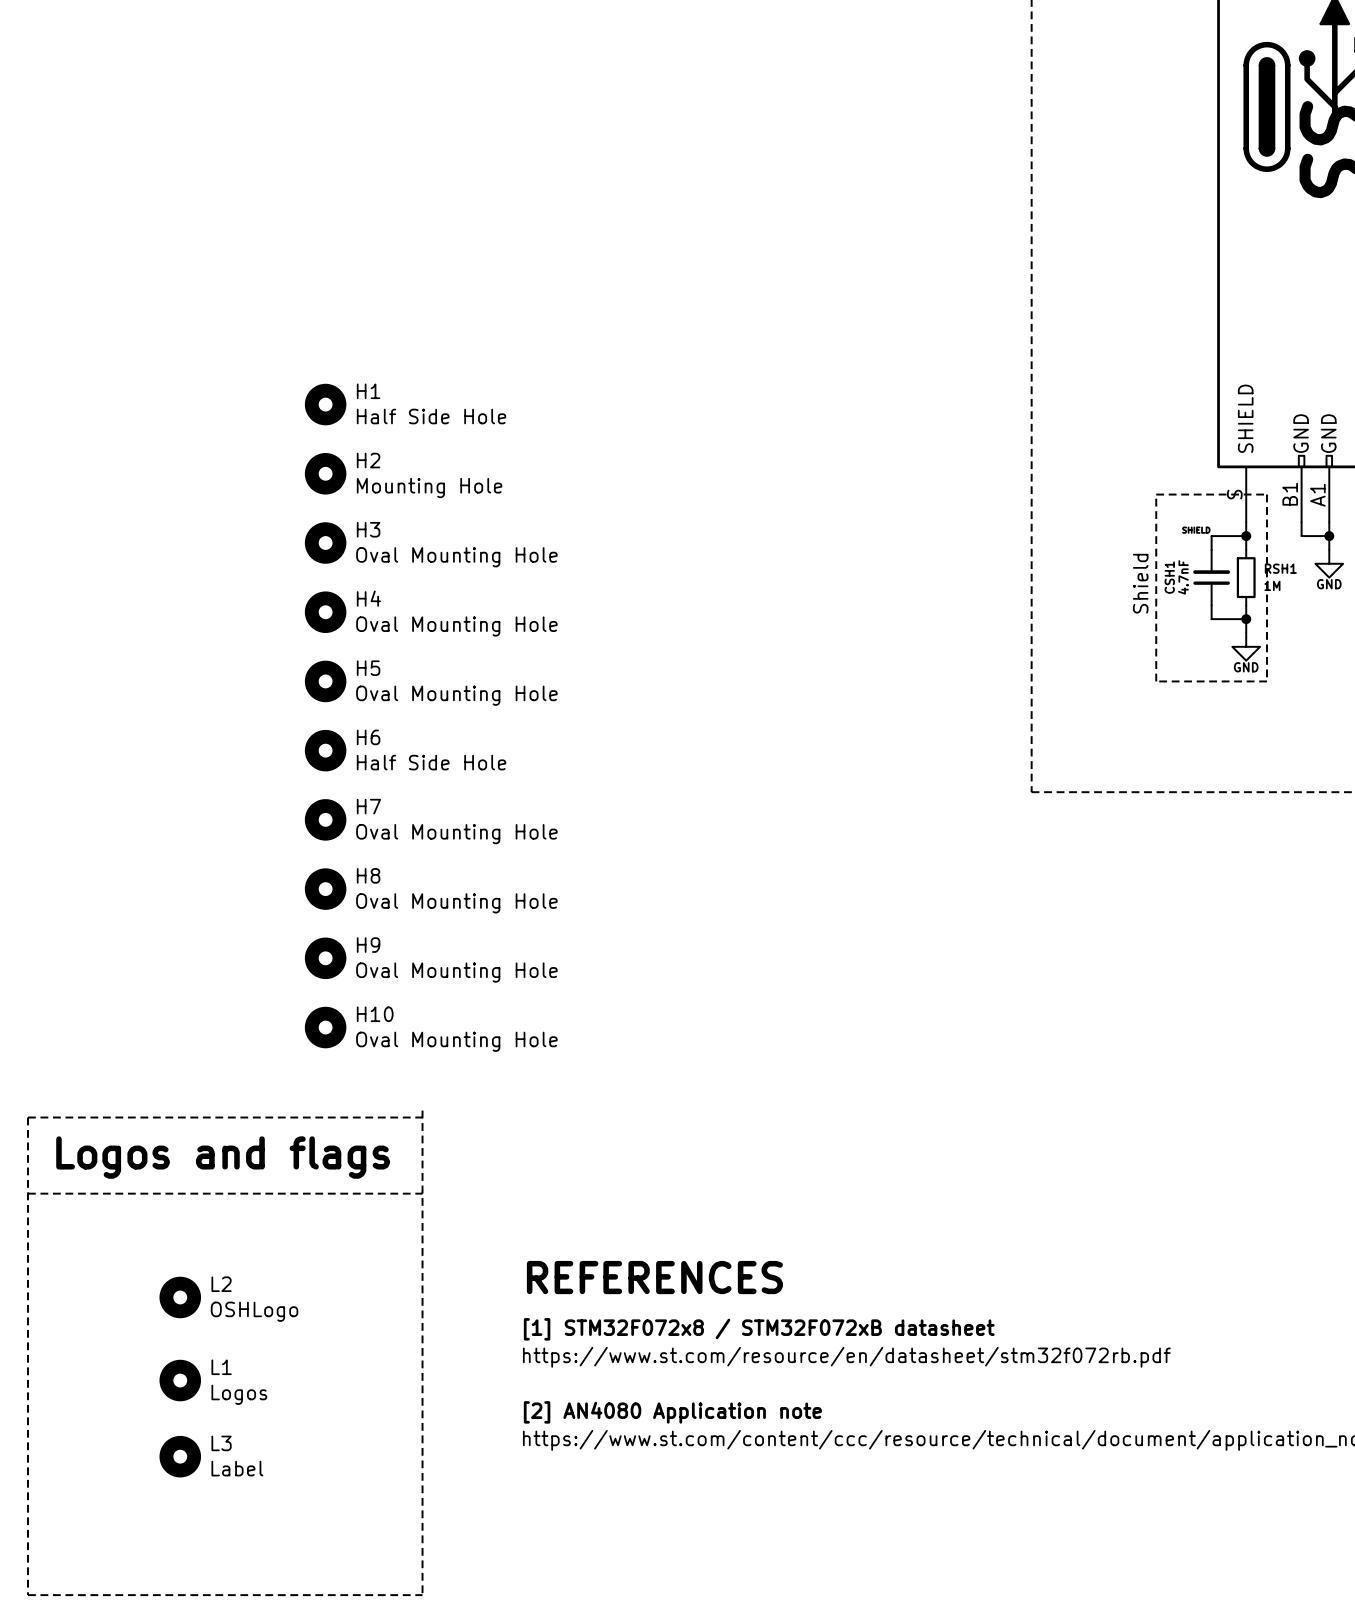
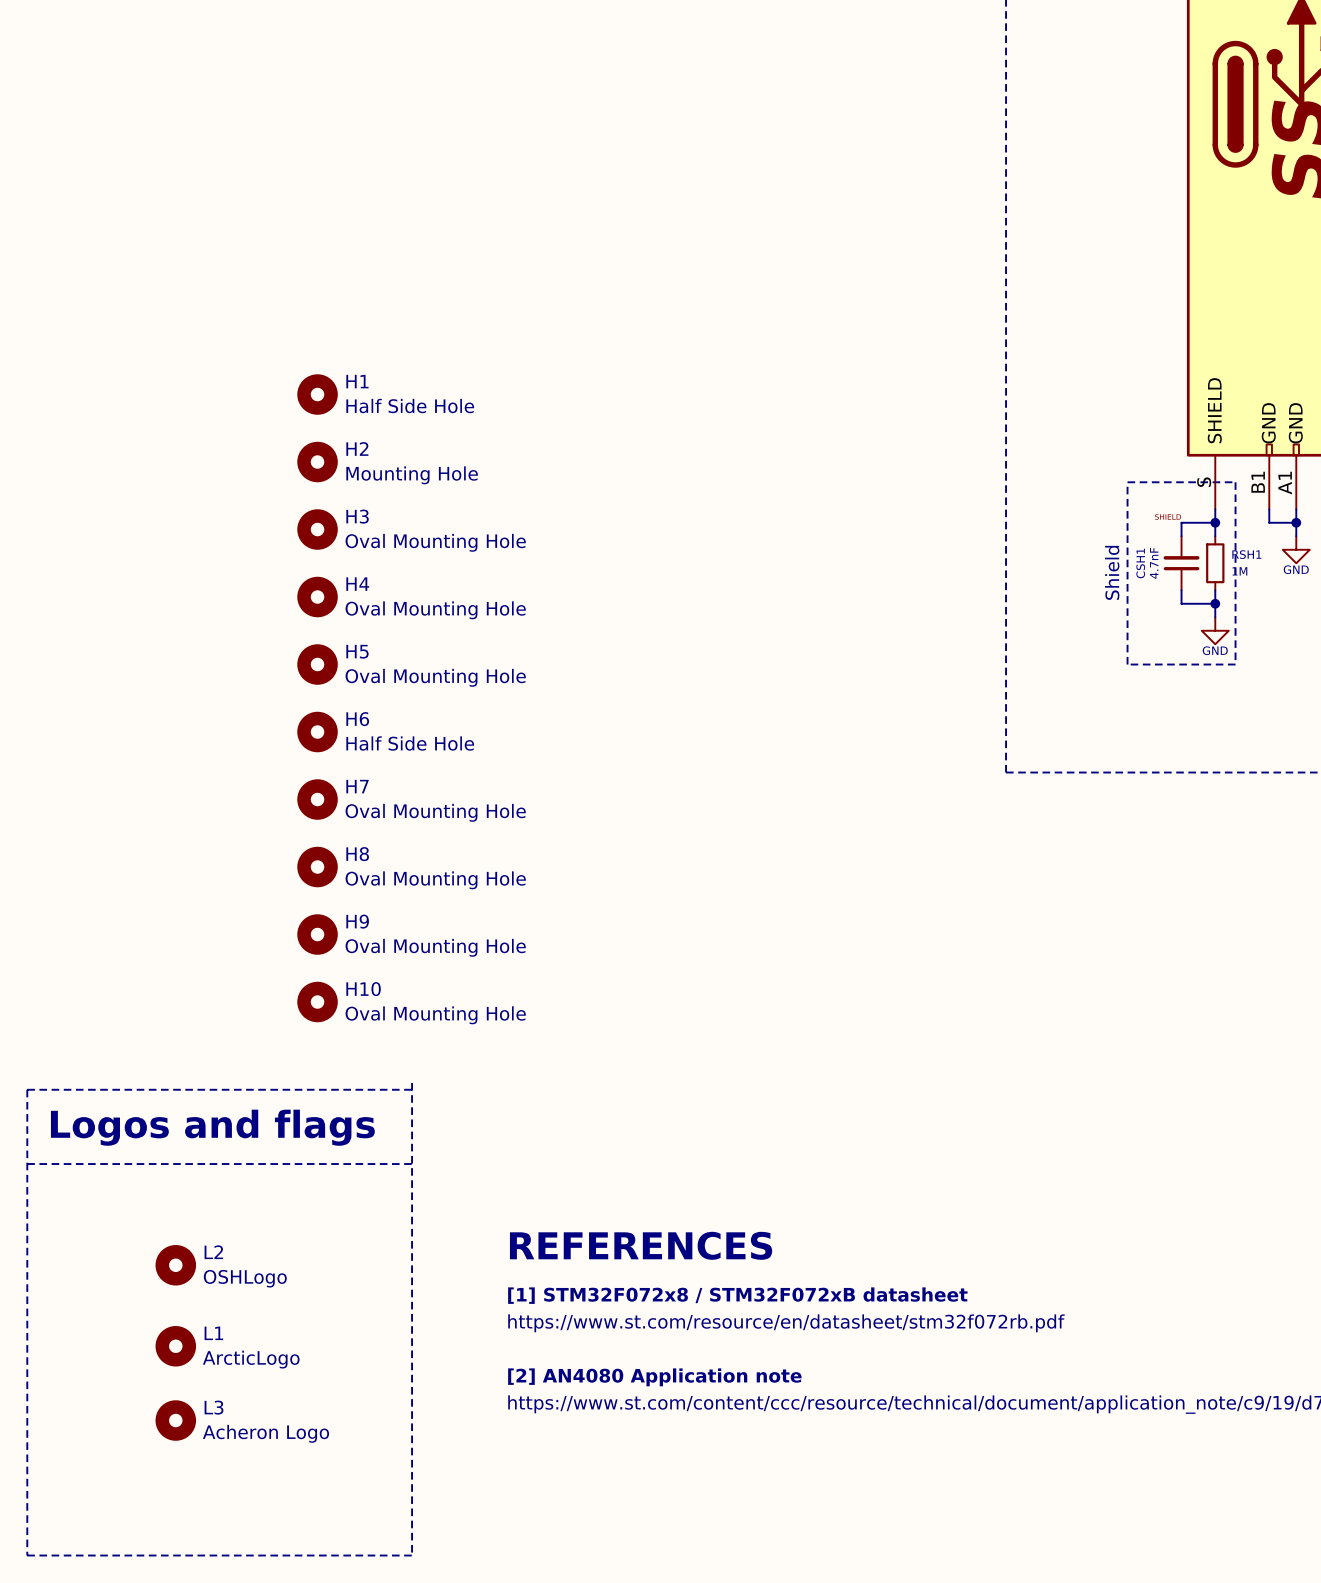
L1 value: Logos (239, 1394) -> ArcticLogo (251, 1359)
L3 value: Label (237, 1468) -> Acheron Logo (265, 1433)

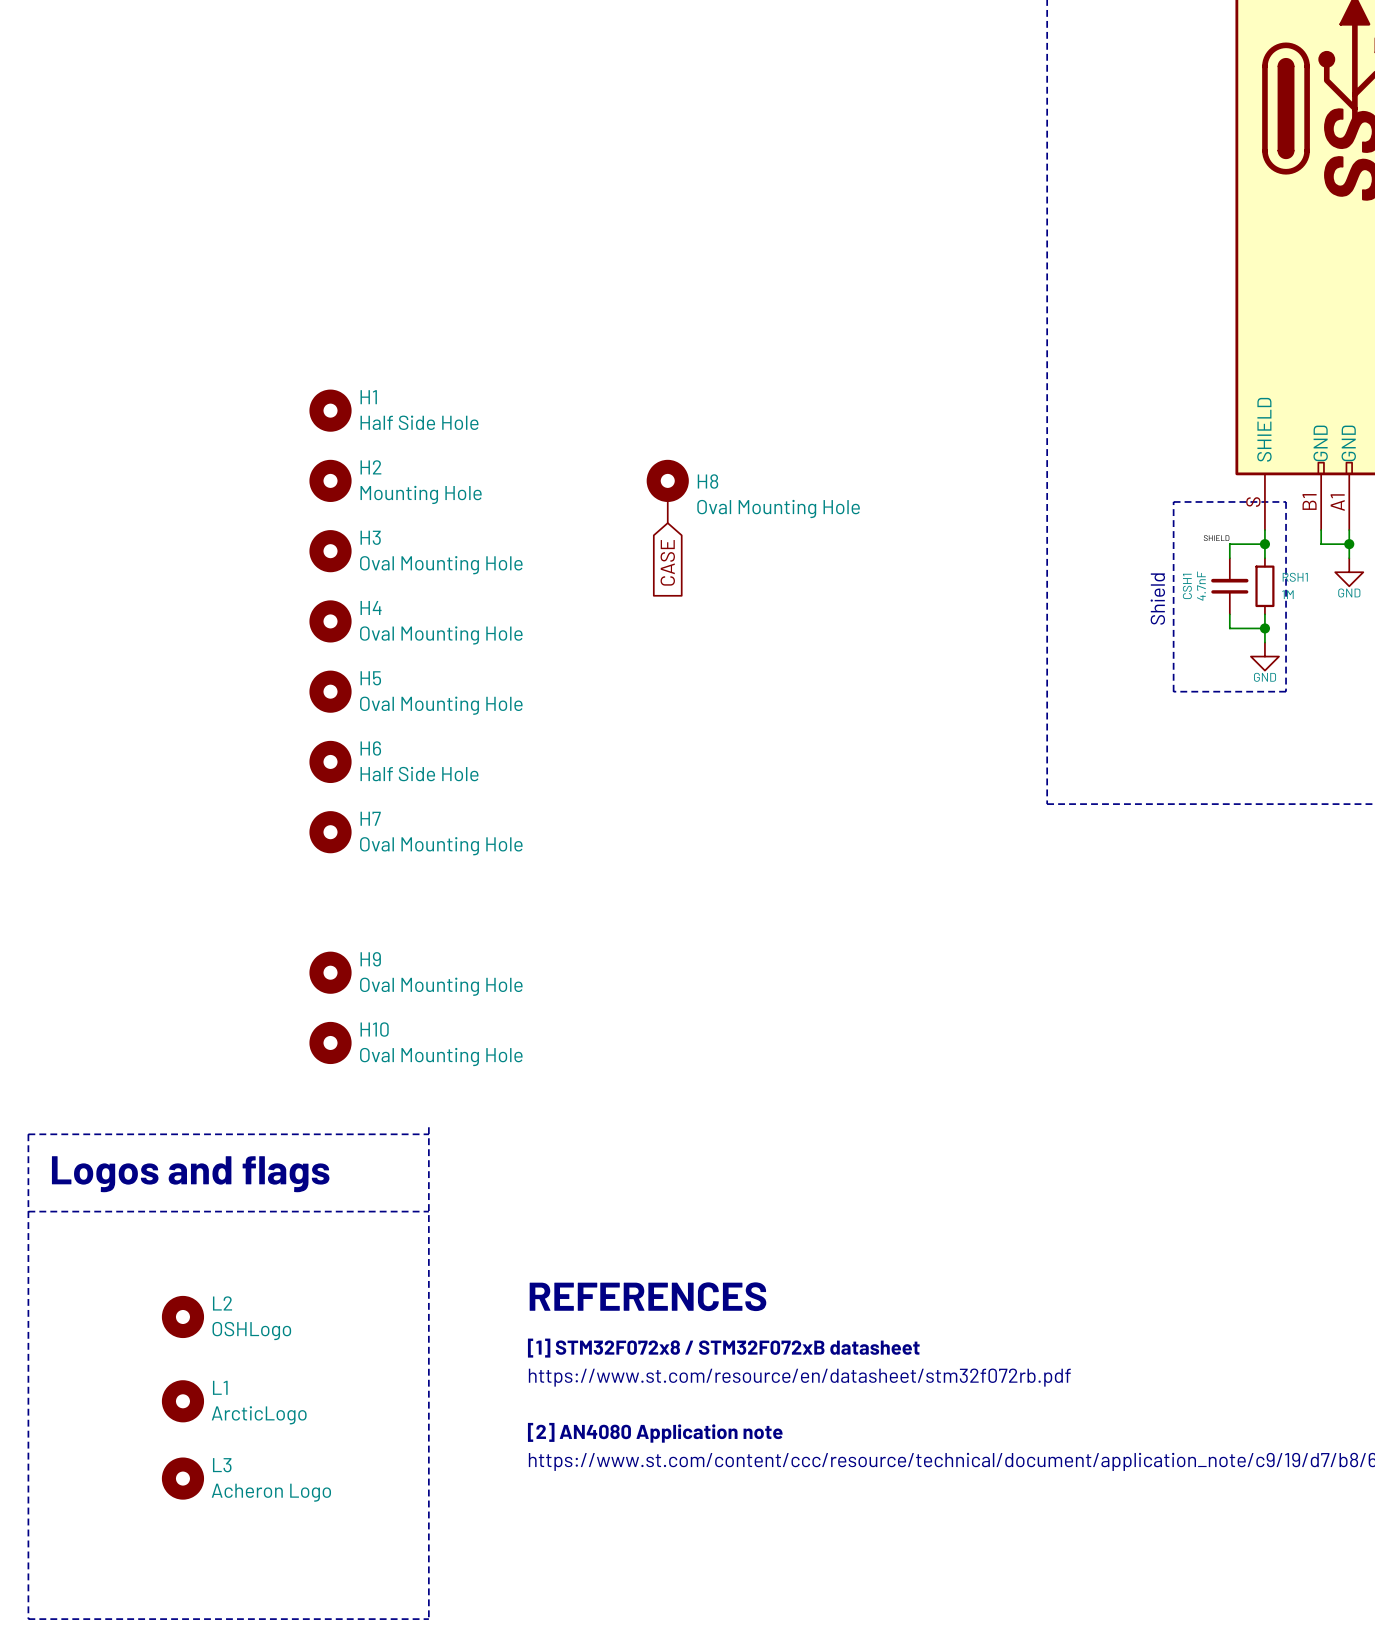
global label: none -> CASE (667, 562)
H8 symbol: [297, 846, 338, 888] -> [646, 459, 689, 524]

